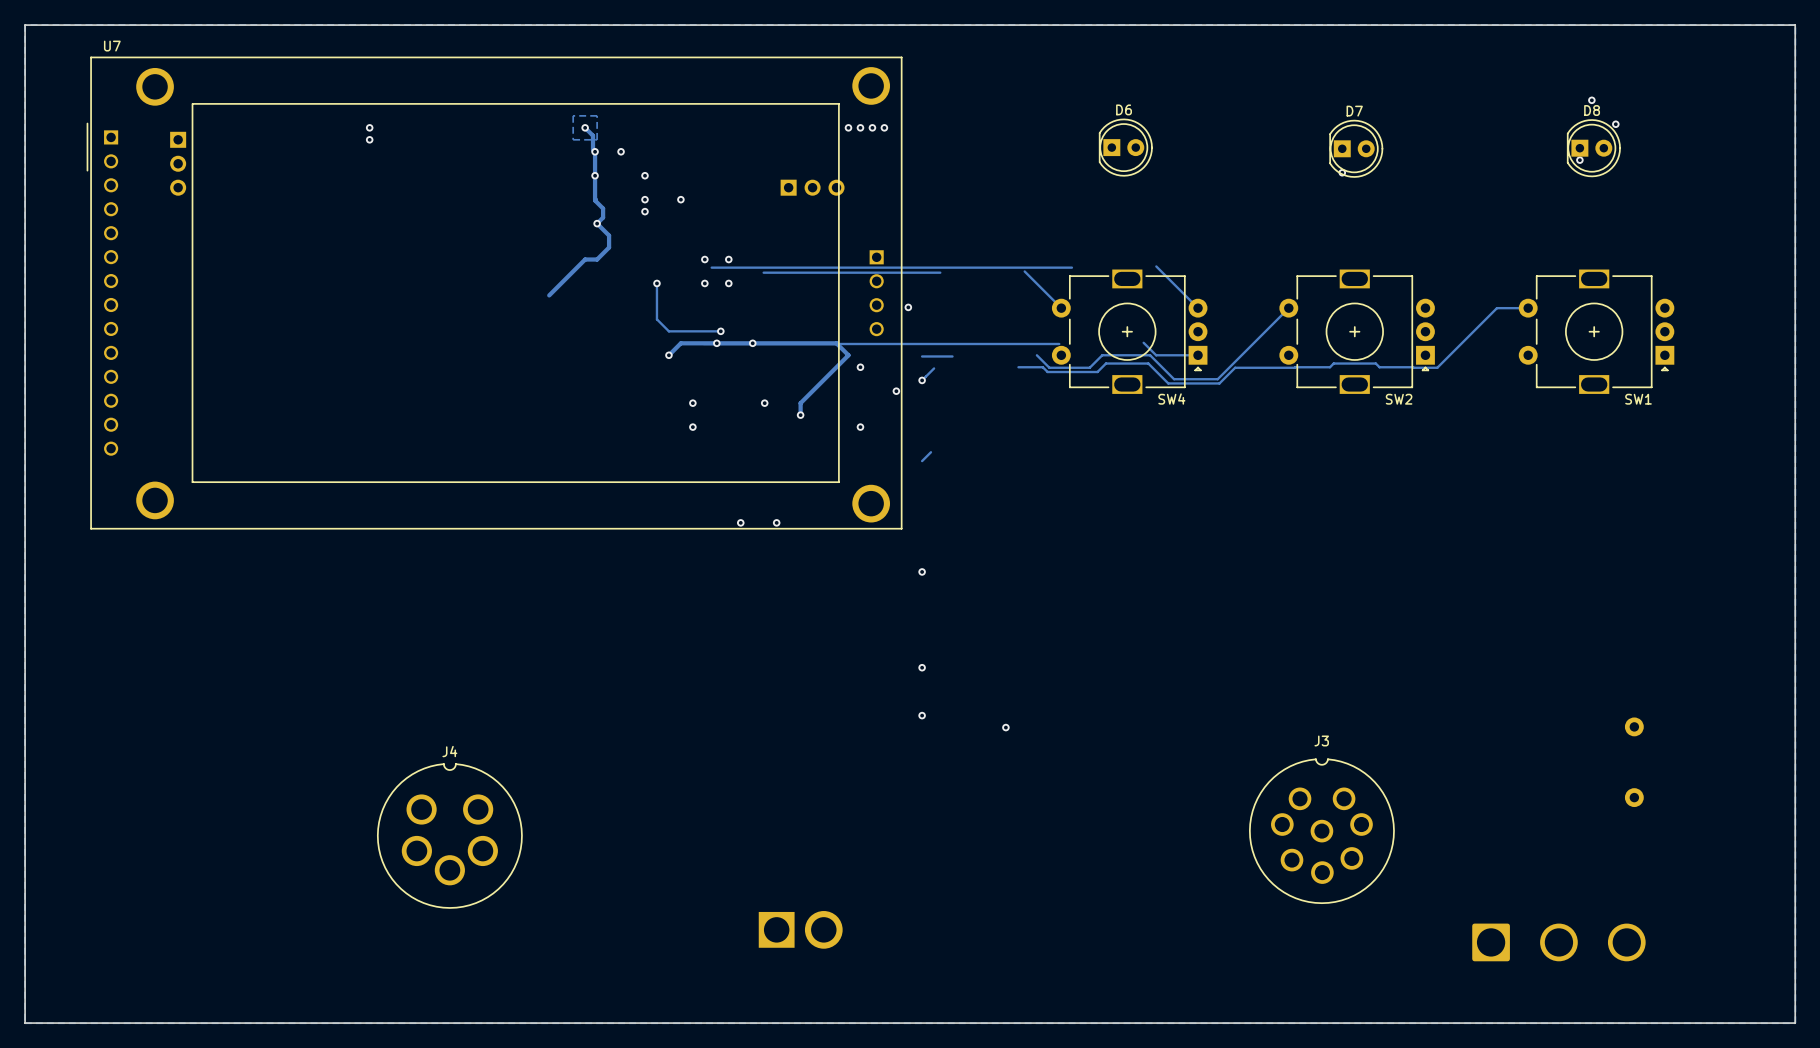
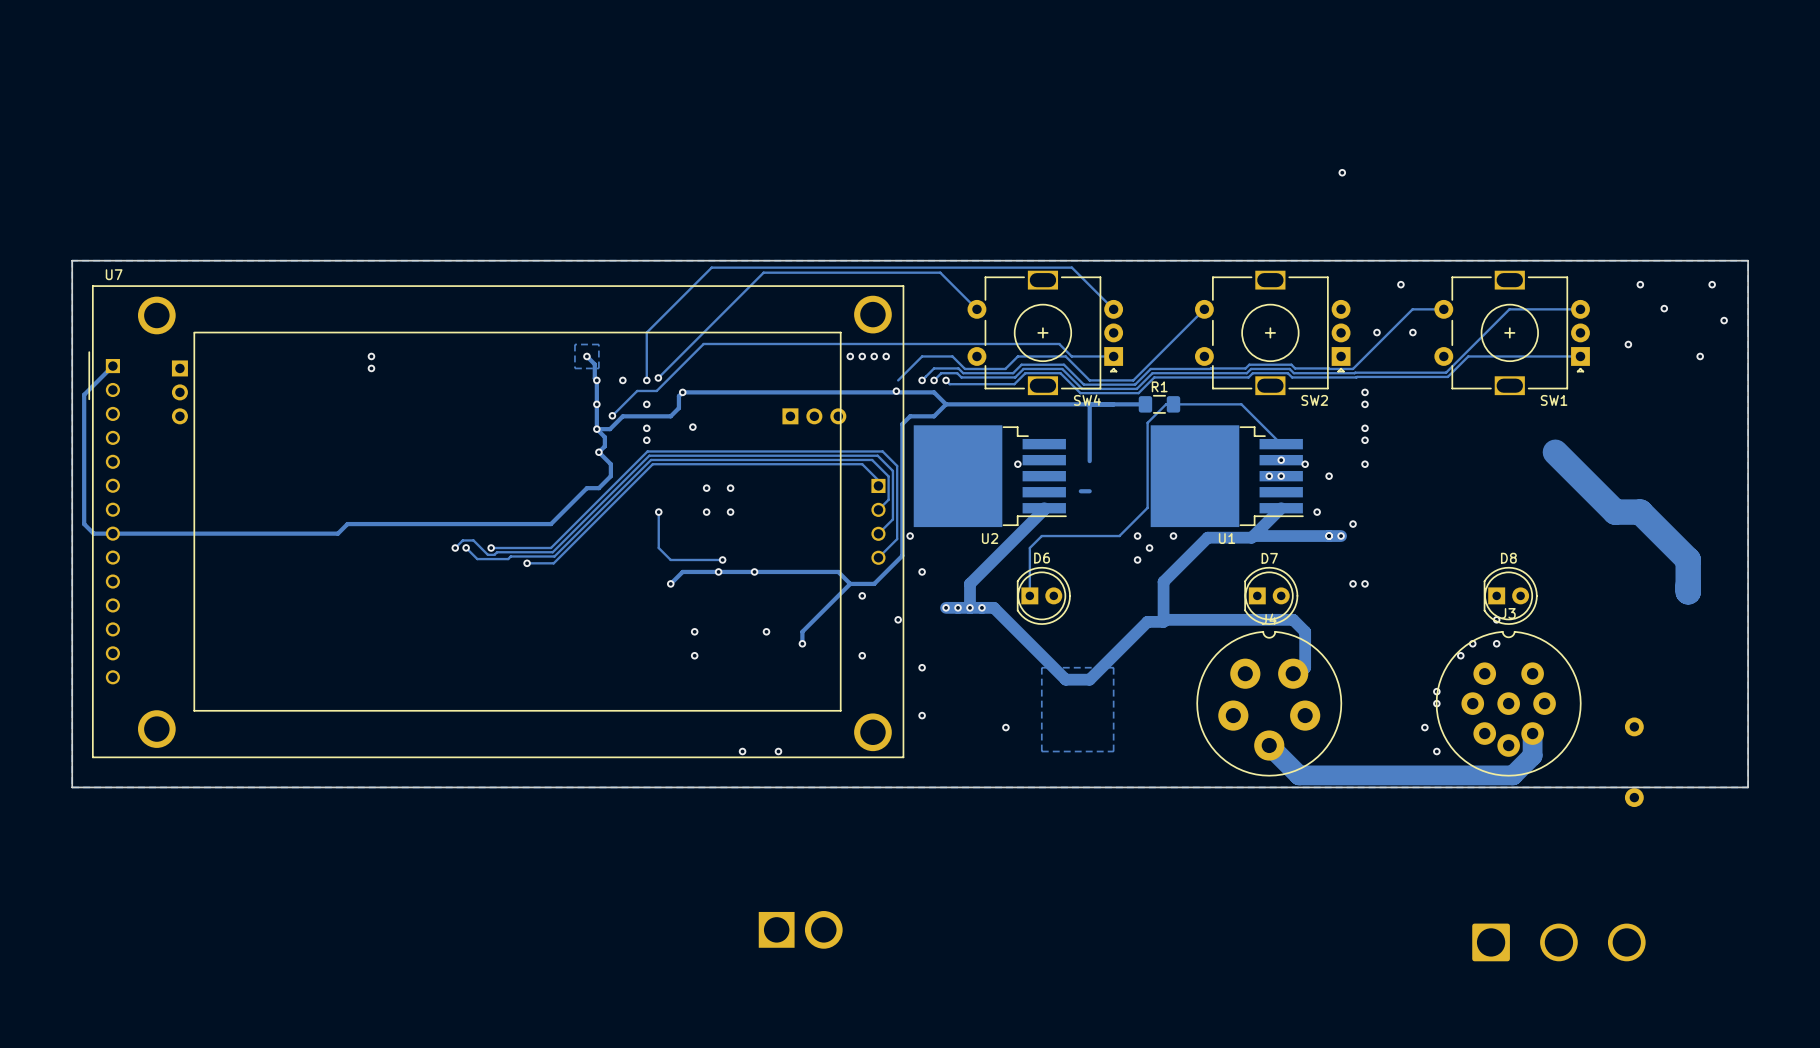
board edge: (1795, 25) (1795, 1023) (25, 1023) (25, 25) (1795, 25) -> none
via: (1591, 100) -> none
zone outline: (597, 115) (597, 139) (573, 139) (573, 115) (597, 115) -> (598, 344) (598, 368) (574, 368) (574, 344) (598, 344)
via: (1615, 124) -> none
via: (369, 127) -> none
track: (585, 127) (593, 135) (593, 149) (595, 151) (595, 199) -> (586, 356) (594, 364) (594, 378) (596, 380) (596, 428)
via: (585, 127) -> none
via: (848, 127) -> none
via: (860, 127) -> none
via: (872, 127) -> none
via: (884, 127) -> none
via: (369, 139) -> none
D6 position: (1125, 147) -> (1043, 595)
D7 position: (1356, 148) -> (1271, 595)
D8 position: (1593, 148) -> (1510, 595)
via: (595, 151) -> none
via: (621, 151) -> none
via: (1579, 160) -> none
part position: (178, 163) -> (179, 392)
via: (595, 175) -> none
via: (644, 175) -> none
part position: (812, 187) -> (814, 416)
track: (595, 199) (603, 208) (603, 217) (597, 223) (609, 235) (609, 247) (597, 259) (585, 259) (549, 295) -> none
via: (644, 199) -> none
via: (680, 199) -> none
via: (644, 211) -> none
via: (597, 223) -> none
via: (704, 259) -> none
via: (728, 259) -> none
board edge: none -> (1748, 260) (1748, 787) (72, 787) (72, 260) (1748, 260)
track: (1156, 266) (1198, 308) -> (1071, 267) (1113, 309)
track: none -> (711, 267) (646, 332) (646, 380)
track: (1024, 271) (1061, 308) -> (940, 272) (976, 309)
track: none -> (763, 272) (658, 377)
track: (656, 283) (656, 319) (668, 331) (720, 331) -> (658, 512) (658, 548) (670, 559) (722, 559)
via: (656, 283) -> none
via: (704, 283) -> none
via: (728, 283) -> none
via: none -> (1400, 284)
via: none -> (1640, 284)
via: none -> (1712, 284)
U7 position: (494, 293) -> (496, 521)
via: (908, 307) -> none
track: (1288, 308) (1217, 379) (1174, 379) (1150, 355) (1102, 355) (1089, 367) (1049, 367) (1036, 355) -> (1204, 309) (1133, 380) (1089, 380) (1065, 356) (1017, 356) (1005, 368) (965, 368) (952, 356)
track: (1528, 308) (1496, 308) (1437, 367) (1379, 367) (1375, 363) (1333, 363) (1330, 367) (1235, 367) (1219, 383) (1168, 383) (1148, 363) (1105, 363) (1097, 372) (1047, 372) (1042, 367) (1018, 367) -> (1443, 309) (1412, 309) (1352, 368) (1295, 368) (1291, 364) (1249, 364) (1245, 368) (1150, 368) (1135, 384) (1083, 384) (1063, 364) (1021, 364) (1013, 373) (963, 373) (958, 368) (934, 368)
via: none -> (1664, 308)
track: none -> (1580, 309) (1509, 309) (1446, 372) (1293, 373) (1289, 368) (1251, 368) (1246, 373) (1152, 373) (1136, 388) (1082, 388) (1062, 368) (1023, 368) (1015, 377) (961, 377) (957, 373) (941, 373) (934, 380)
via: none -> (1724, 320)
via: (720, 331) -> none
SW4 position: (1129, 331) -> (1045, 332)
SW2 position: (1357, 331) -> (1272, 332)
SW1 position: (1596, 331) -> (1512, 332)
via: none -> (1376, 332)
via: none -> (1412, 332)
track: (1143, 342) (1156, 355) (1198, 355) -> (1059, 343) (1071, 356) (1113, 356)
track: none -> (703, 343) (656, 390) (637, 390) (612, 415)
via: (716, 343) -> none
via: (752, 343) -> none
via: none -> (1628, 344)
track: (668, 355) (680, 343) (836, 343) (848, 355) (800, 403) (800, 415) -> none
via: (668, 355) -> none
via: none -> (371, 356)
via: none -> (586, 356)
via: none -> (850, 356)
via: none -> (862, 356)
via: none -> (874, 356)
via: none -> (886, 356)
track: none -> (922, 356) (898, 380)
track: none -> (1580, 356) (1468, 356) (1447, 376) (1292, 377) (1287, 373) (1252, 373) (1248, 377) (1154, 377) (1138, 393) (1080, 393) (1060, 373) (1025, 373) (1014, 384) (949, 384) (946, 380)
via: none -> (1700, 356)
track: none -> (112, 366) (84, 394) (84, 524) (93, 533) (337, 533) (347, 524) (551, 524) (586, 488) (598, 488) (610, 476) (610, 464) (598, 452) (604, 446) (604, 437) (596, 429)
via: (860, 367) -> none
via: none -> (371, 368)
via: none -> (658, 377)
via: none -> (596, 380)
via: none -> (622, 380)
via: none -> (646, 380)
via: none -> (934, 380)
via: none -> (946, 380)
via: none -> (1365, 392)
via position: (692, 403) -> (682, 392)
via: (764, 403) -> none
via: none -> (596, 404)
via: none -> (646, 404)
track: none -> (946, 404) (934, 392) (682, 392) (678, 396) (678, 408) (670, 416) (622, 416) (610, 429) (596, 429)
track: none -> (946, 404) (934, 416) (910, 416) (902, 424) (902, 555) (874, 583) (850, 583)
track: none -> (1089, 404) (1089, 461)
track: none -> (1145, 404) (946, 404)
R1: none -> (1159, 404)
via: none -> (1365, 404)
via: none -> (612, 415)
via: (800, 415) -> none
via: (860, 427) -> none
via: none -> (646, 428)
via: none -> (1365, 428)
via: none -> (596, 429)
via: none -> (646, 440)
via: none -> (1365, 440)
track: none -> (1281, 444) (1241, 404) (1166, 404) (1147, 422) (1147, 507) (1119, 536) (1041, 536) (1029, 548) (1029, 595)
via: none -> (598, 452)
track: none -> (1555, 452) (1615, 512) (1640, 512) (1688, 559) (1688, 591)
via: none -> (1281, 460)
via: none -> (1017, 464)
via: none -> (1305, 464)
via: none -> (1365, 464)
U2: none -> (990, 476)
U1: none -> (1227, 476)
via: none -> (1269, 476)
via: none -> (1281, 476)
via: none -> (1329, 476)
track: none -> (878, 485) (878, 480) (862, 464) (652, 464) (553, 563) (527, 563)
via: none -> (706, 488)
via: none -> (730, 488)
track: none -> (1089, 491) (1080, 491)
track: none -> (1044, 508) (969, 583) (969, 607)
track: none -> (1281, 508) (1251, 537) (1207, 537) (1163, 581) (1163, 621) (1147, 621) (1089, 679) (1065, 679) (993, 607) (946, 607)
track: none -> (878, 509) (888, 499) (888, 476) (872, 459) (651, 459) (554, 556) (477, 559) (466, 547)
via: none -> (658, 512)
via: none -> (706, 512)
via: none -> (1317, 512)
via position: (740, 522) -> (730, 512)
via: (776, 522) -> none
via: none -> (1353, 524)
track: none -> (878, 533) (892, 519) (892, 470) (877, 455) (649, 455) (552, 552) (497, 552) (494, 554) (487, 554) (473, 540) (462, 540) (455, 548)
via: none -> (910, 536)
via: none -> (1137, 536)
via: none -> (1173, 536)
via: none -> (1329, 536)
track: none -> (1341, 536) (1257, 536)
via: none -> (1341, 536)
via: none -> (466, 547)
via: none -> (455, 548)
track: none -> (491, 548) (551, 548) (647, 451) (882, 451) (897, 465) (897, 539) (878, 557)
via: none -> (491, 548)
via: none -> (1149, 548)
via: none -> (722, 559)
via: none -> (1137, 559)
via: none -> (527, 563)
via: none -> (718, 571)
via: none -> (754, 571)
via: none -> (670, 583)
track: none -> (850, 583) (838, 571) (682, 571) (670, 583)
track: none -> (850, 583) (802, 631) (802, 643)
via: none -> (1353, 583)
via: none -> (1365, 583)
via: none -> (862, 595)
via: none -> (946, 607)
via: none -> (958, 607)
via: none -> (969, 607)
via: none -> (981, 607)
via: none -> (898, 619)
track: none -> (1165, 619) (1293, 619) (1305, 631) (1305, 667) (1299, 673) (1293, 673)
via: none -> (1496, 619)
via: none -> (694, 631)
via: none -> (766, 631)
via: none -> (802, 643)
via: none -> (1472, 643)
via: none -> (1496, 643)
via: none -> (694, 655)
via: none -> (862, 655)
via: none -> (1460, 655)
zone outline: none -> (1113, 667) (1113, 751) (1041, 751) (1041, 667) (1113, 667)
via: none -> (1436, 691)
via: none -> (1436, 703)
via: none -> (1424, 727)
track: none -> (1532, 733) (1532, 755) (1512, 775) (1299, 775) (1269, 745)
via: none -> (742, 751)
via: none -> (778, 751)
via: none -> (1436, 751)
J3 footprint: [1249, 758, 1395, 904] -> [1436, 631, 1582, 777]
J4 footprint: [377, 763, 523, 909] -> [1196, 631, 1342, 777]

